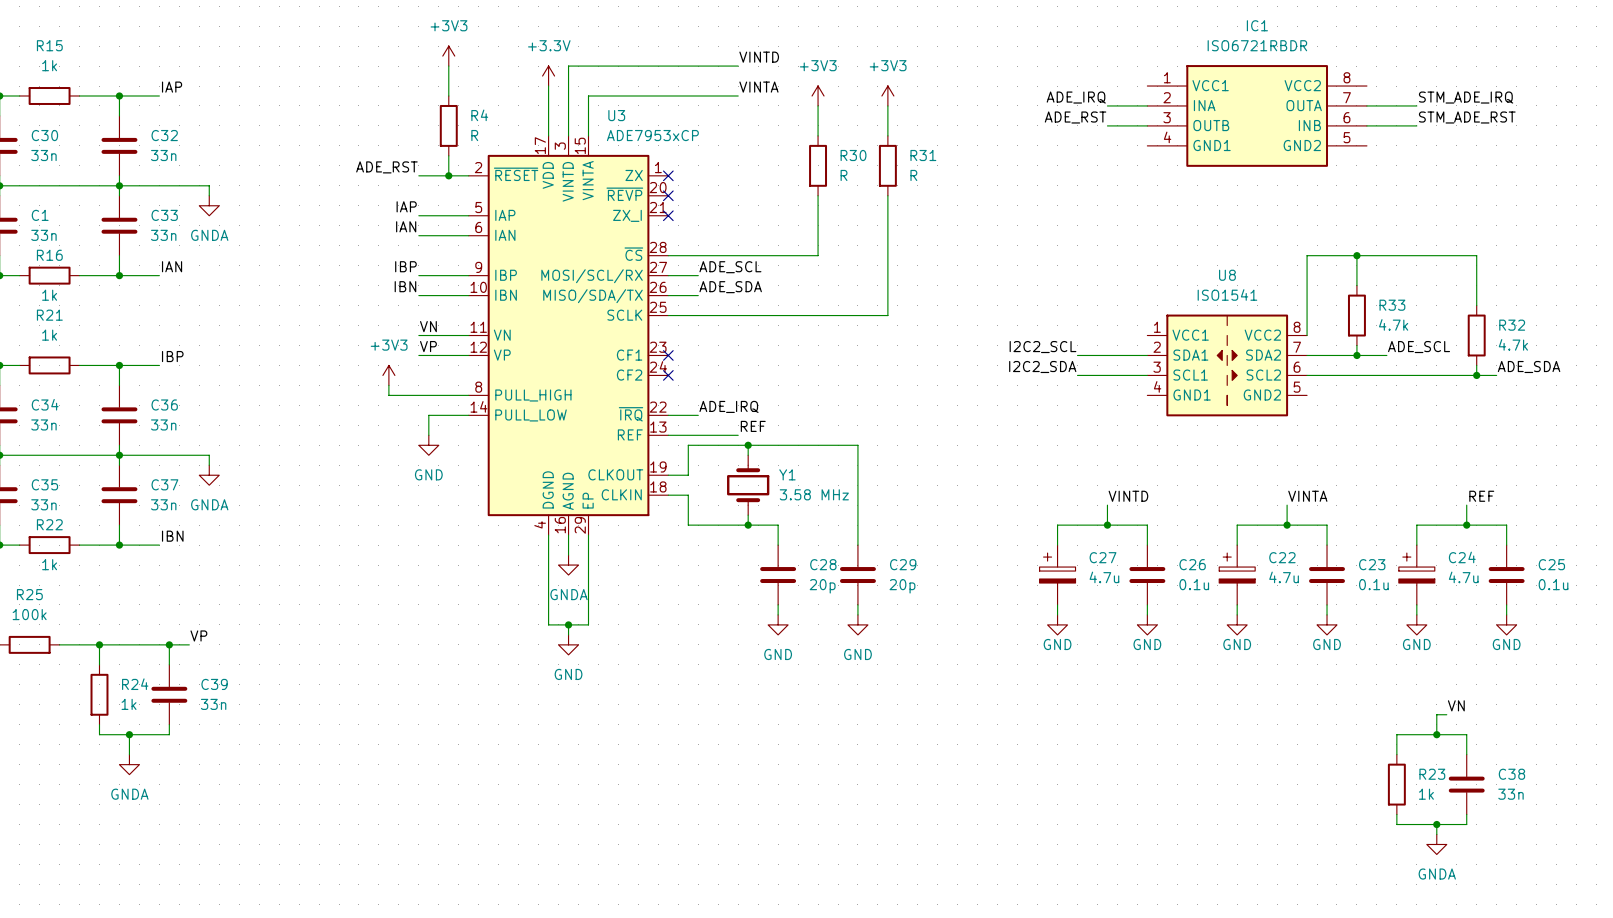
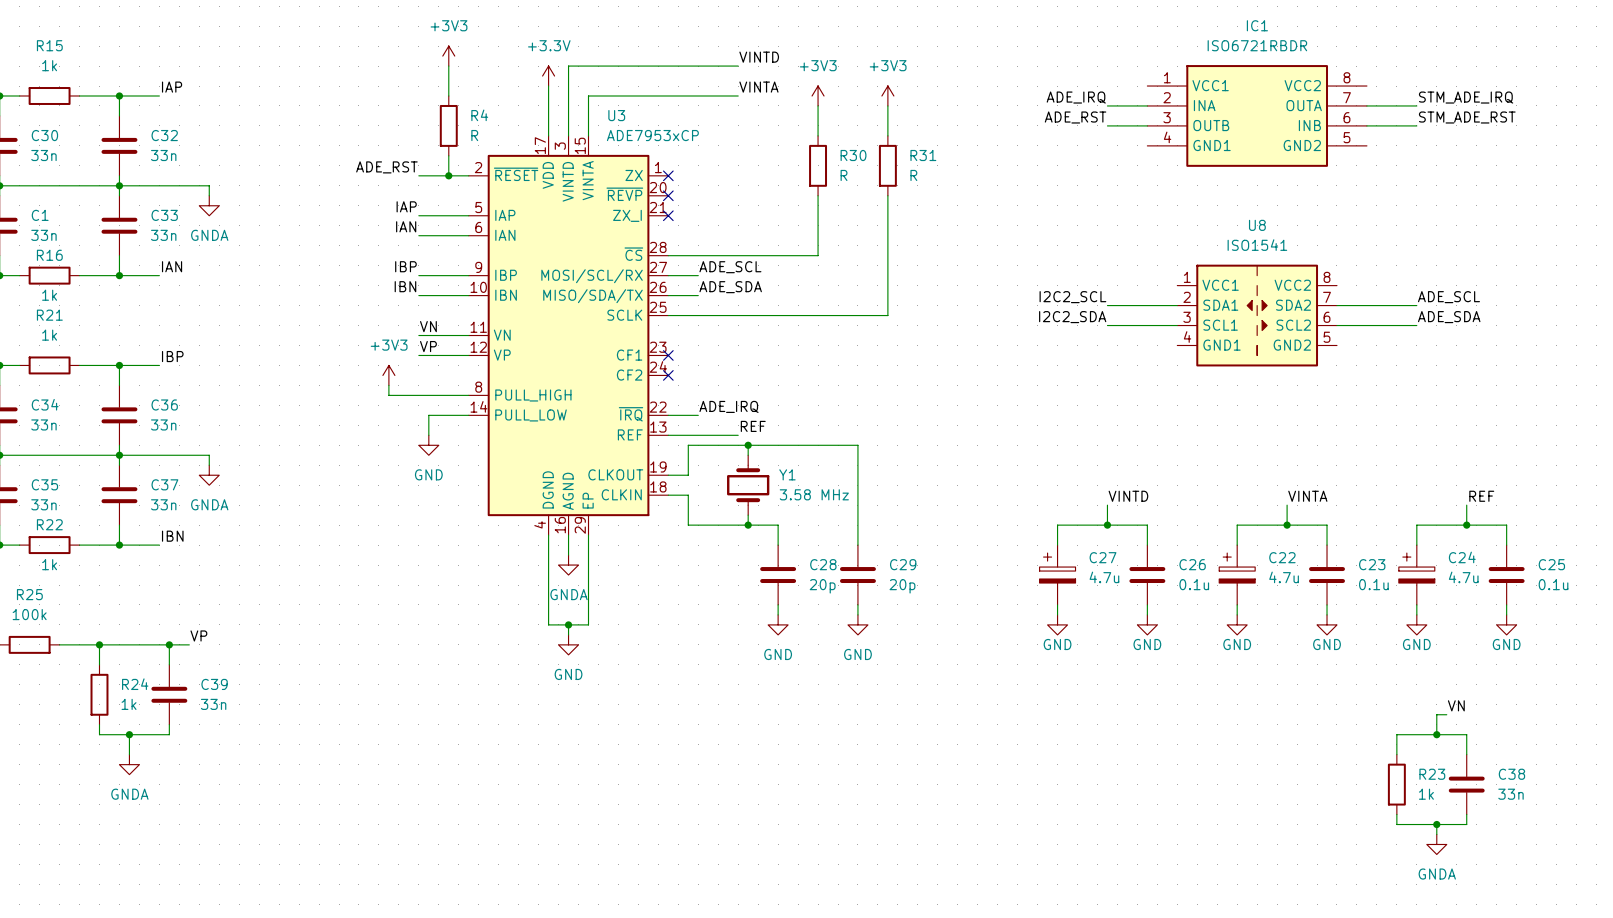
wire: (1356, 255) (1356, 285) -> none
junction: (1356, 255) -> none
wire: (1476, 305) (1476, 255) (1307, 255) (1307, 335) -> none
R33: 4.7k (1356, 315) -> none
wire: none -> (1336, 325) (1416, 325)
R32: 4.7k (1476, 335) -> none
wire: (1356, 345) (1356, 355) -> none
label position: I2C2_SCL (1042, 347) -> I2C2_SCL (1072, 297)
label position: ADE_SCL (1419, 347) -> ADE_SCL (1448, 297)
wire: (1077, 355) (1147, 355) -> (1107, 305) (1177, 305)
wire: (1307, 355) (1386, 355) -> (1336, 305) (1416, 305)
junction: (1356, 355) -> none
U8 position: (1227, 365) -> (1257, 315)
wire: (1476, 365) (1476, 375) -> none
label position: I2C2_SDA (1042, 367) -> I2C2_SDA (1072, 317)
label position: ADE_SDA (1529, 367) -> ADE_SDA (1449, 317)
wire: (1077, 375) (1147, 375) -> (1107, 325) (1177, 325)
wire: (1307, 375) (1496, 375) -> none
junction: (1476, 375) -> none

